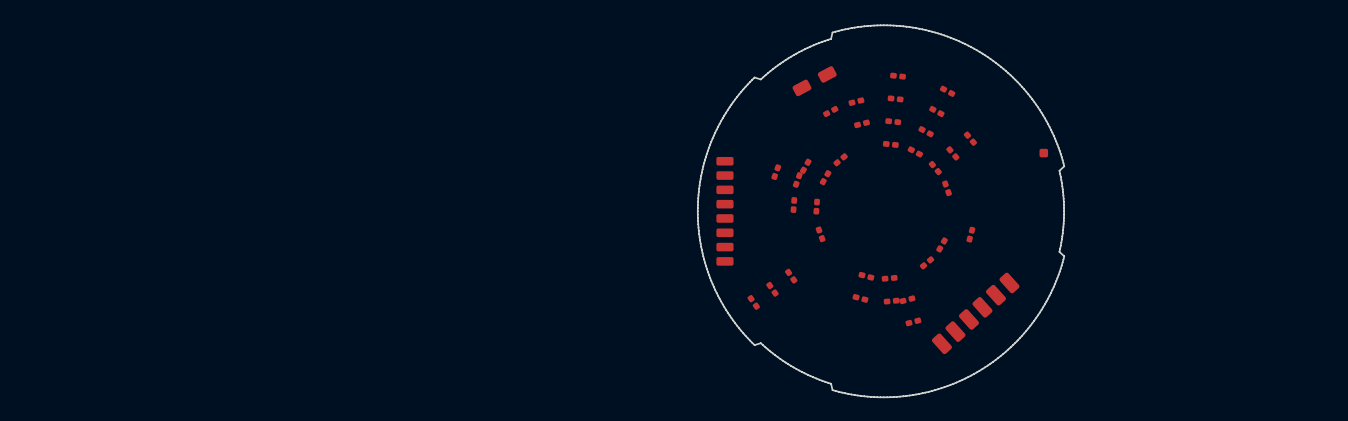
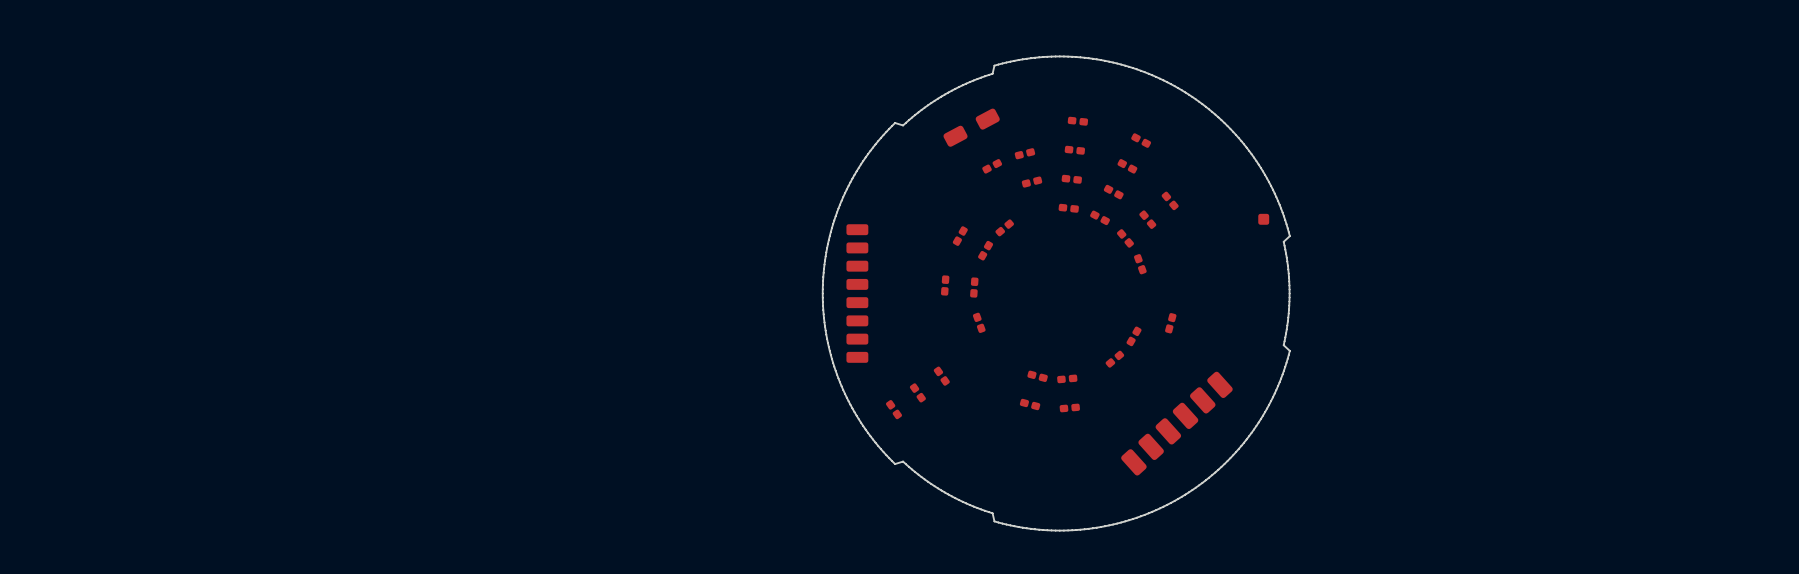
part: (776, 172) -> none
part: (797, 179) -> none
part: (907, 299) -> none
part: (913, 321) -> none

